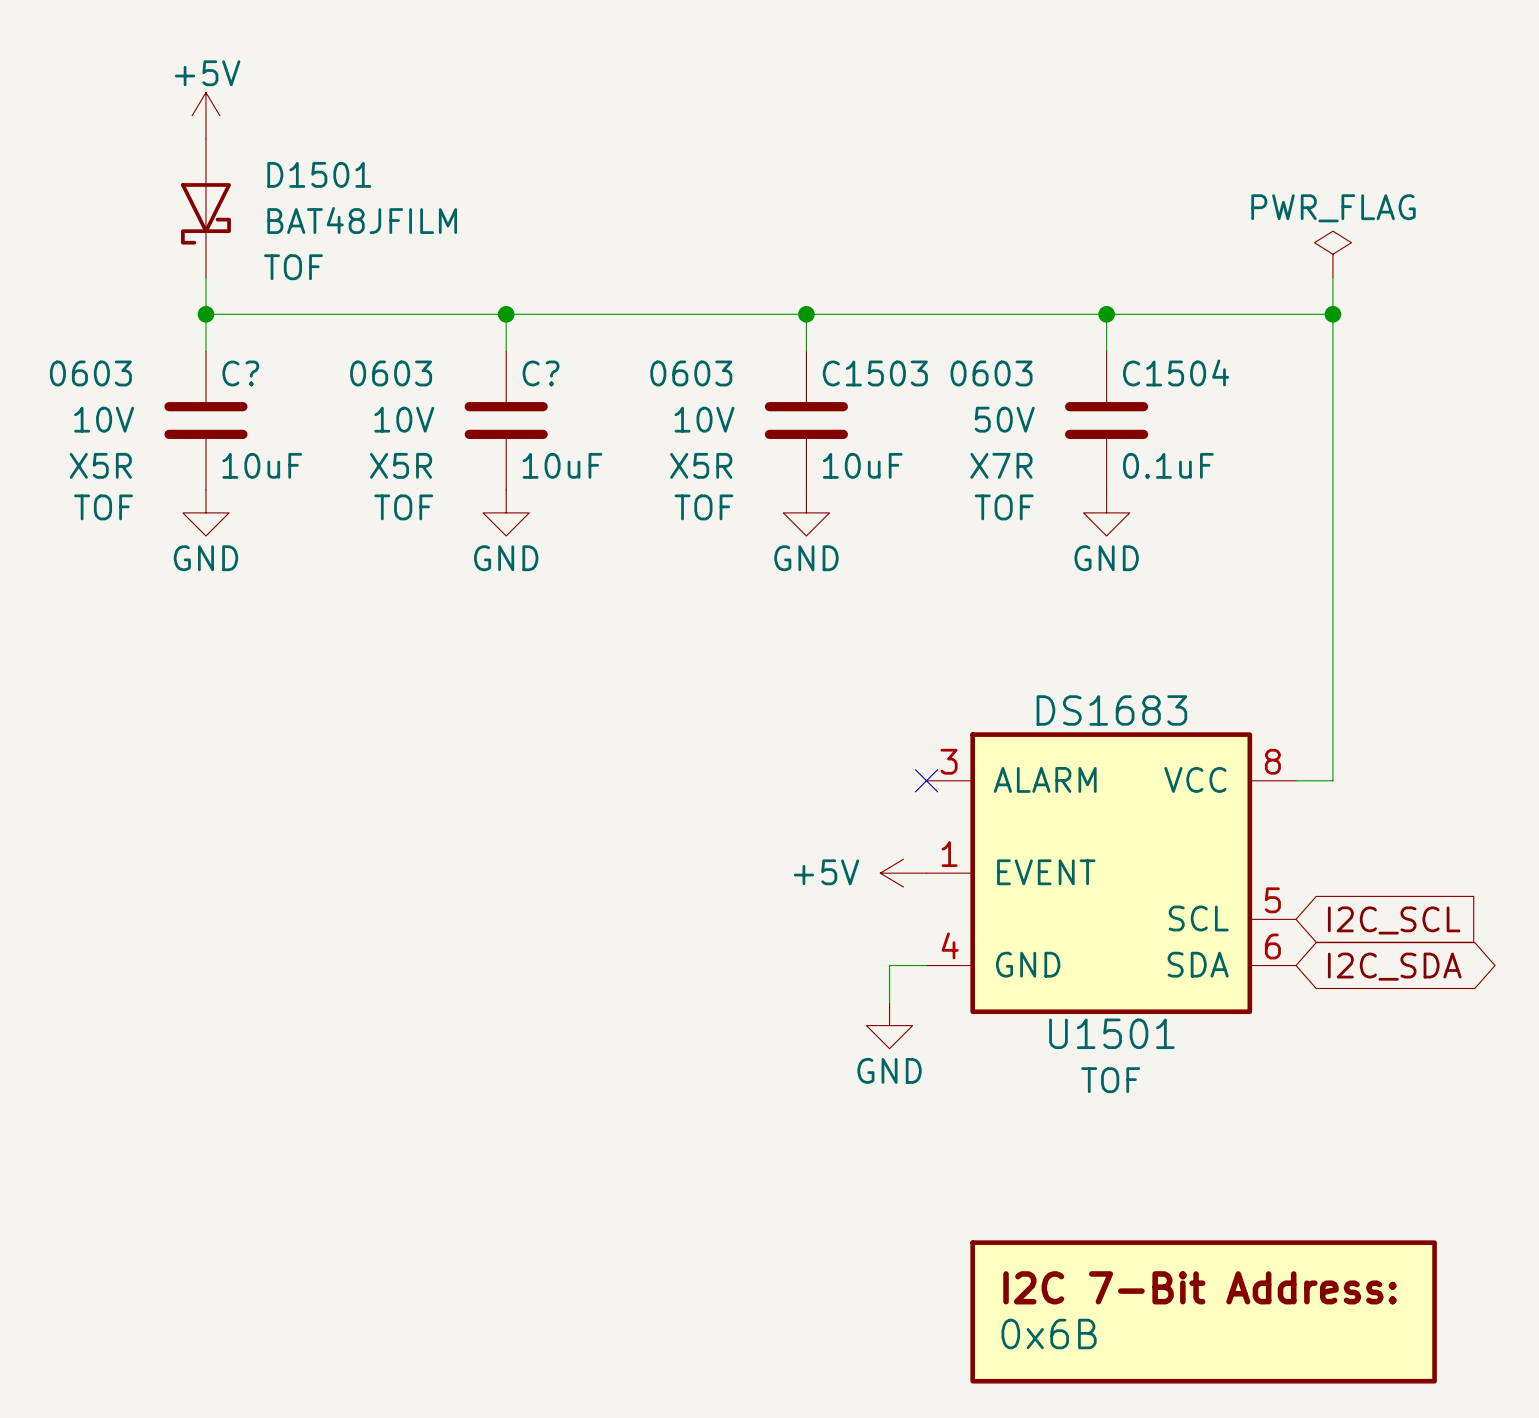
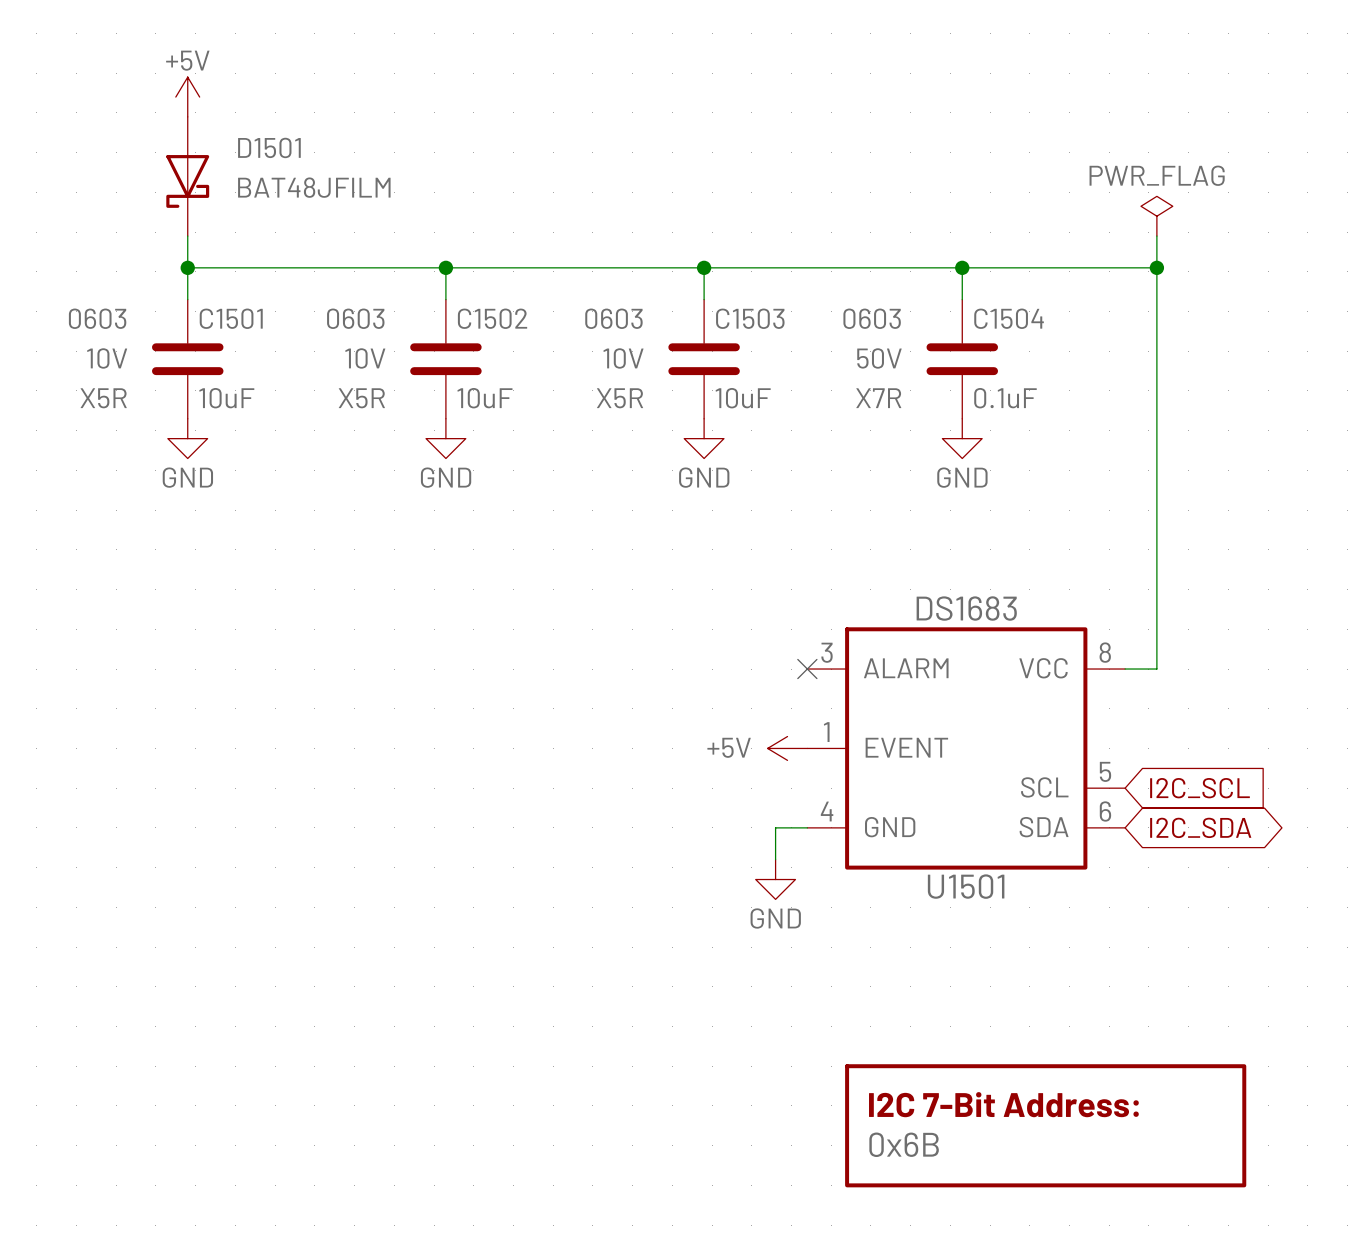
D1501 text: TOF (293, 267) -> none
C? name: C? (240, 373) -> C1501 (231, 318)
C? name: C? (541, 373) -> C1502 (492, 318)
C? text: TOF (103, 507) -> none
C? text: TOF (403, 507) -> none
C1503 text: TOF (703, 507) -> none
C1504 text: TOF (1004, 507) -> none
U1501 text: TOF (1110, 1080) -> none

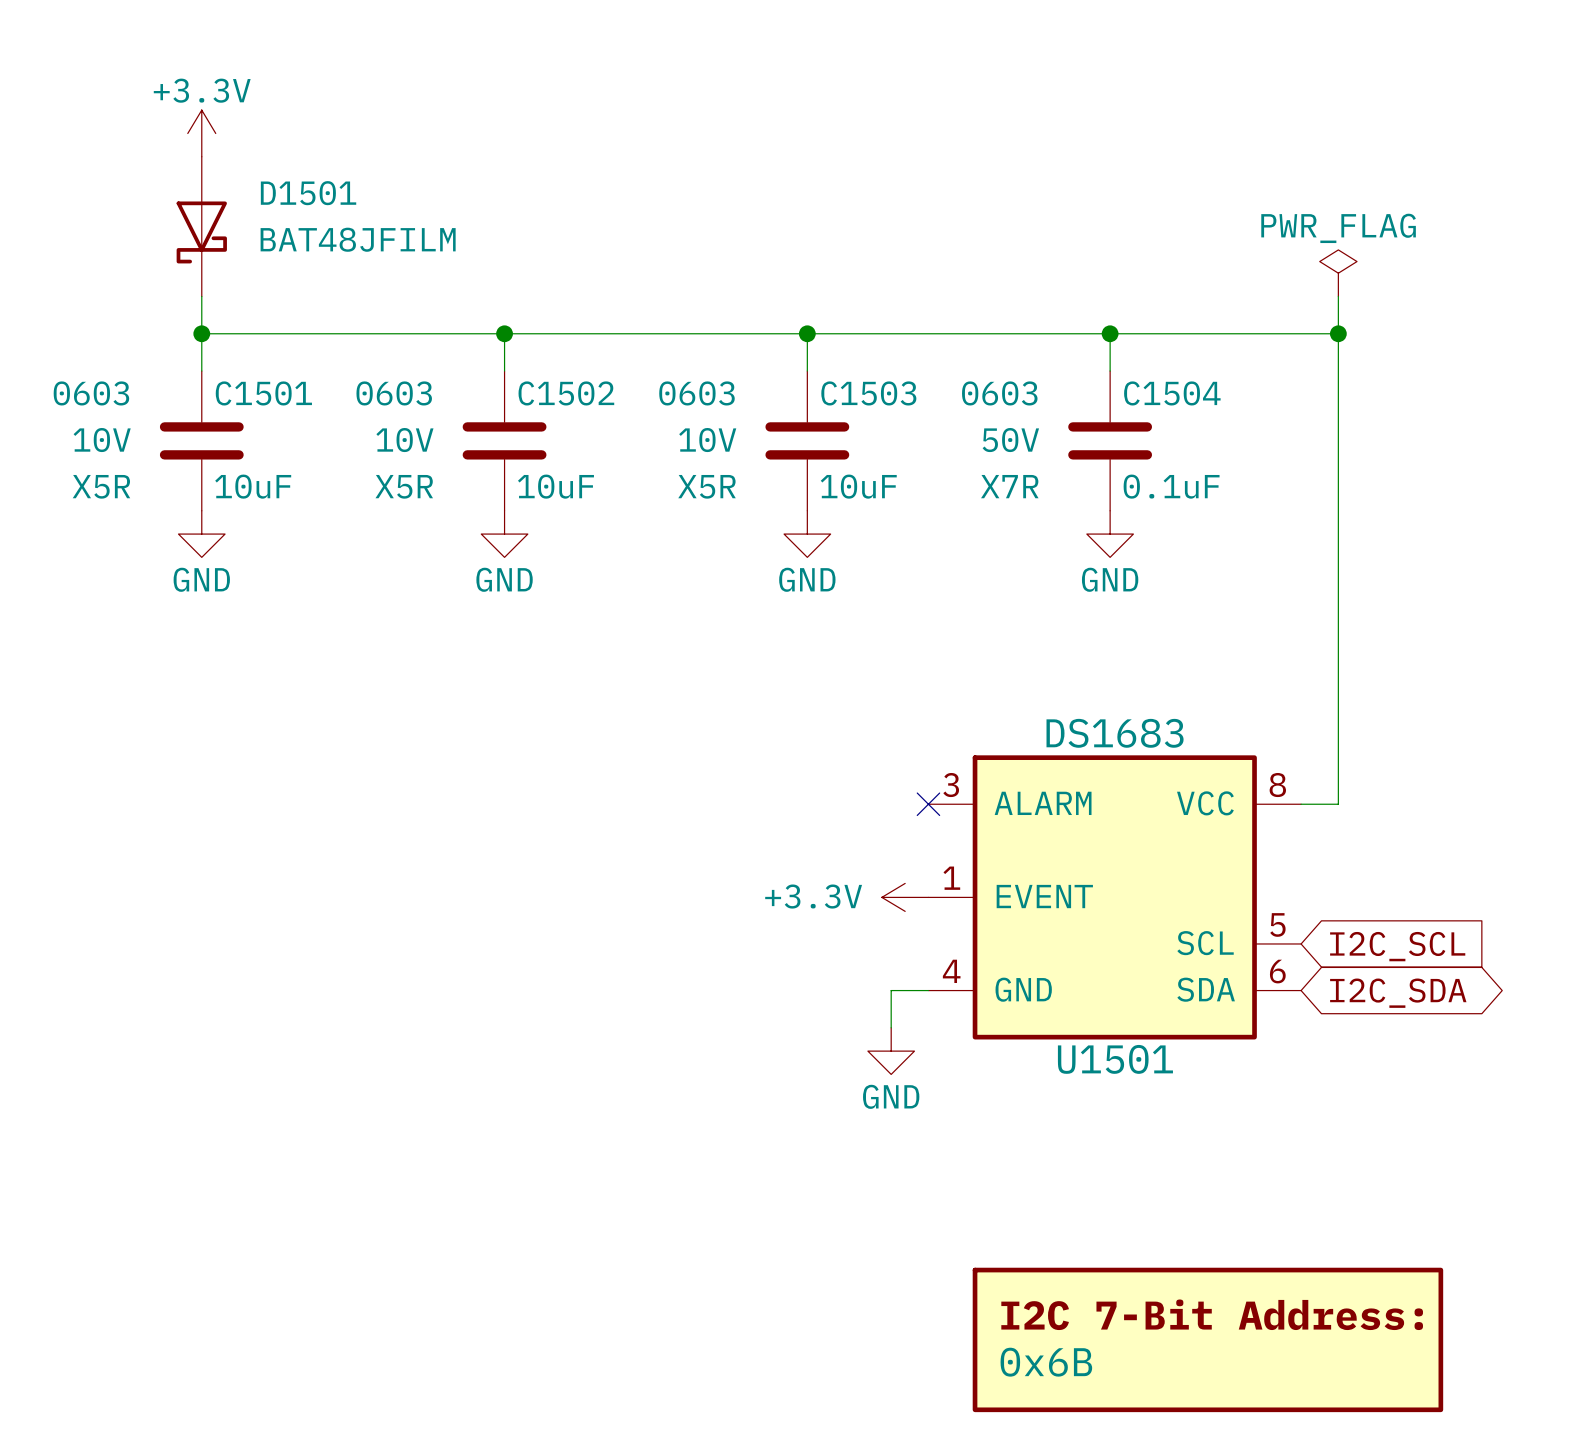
power symbol: +5V (187, 97) -> +3.3V (201, 133)
power symbol: +5V (787, 748) -> +3.3V (905, 897)

